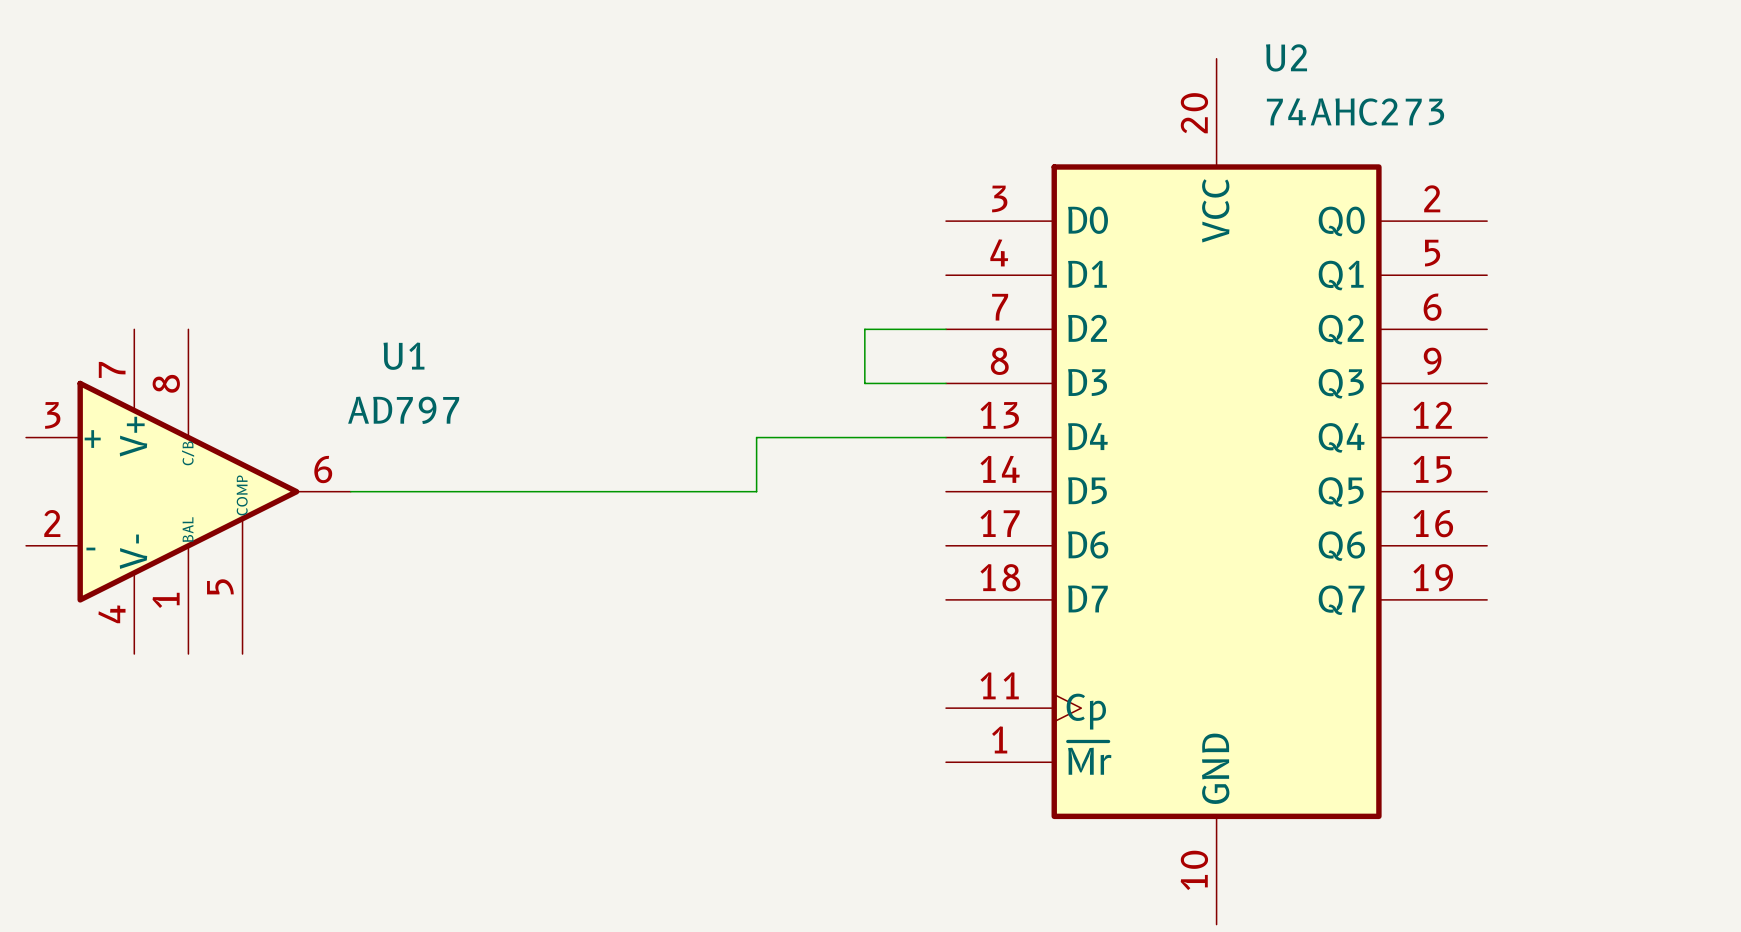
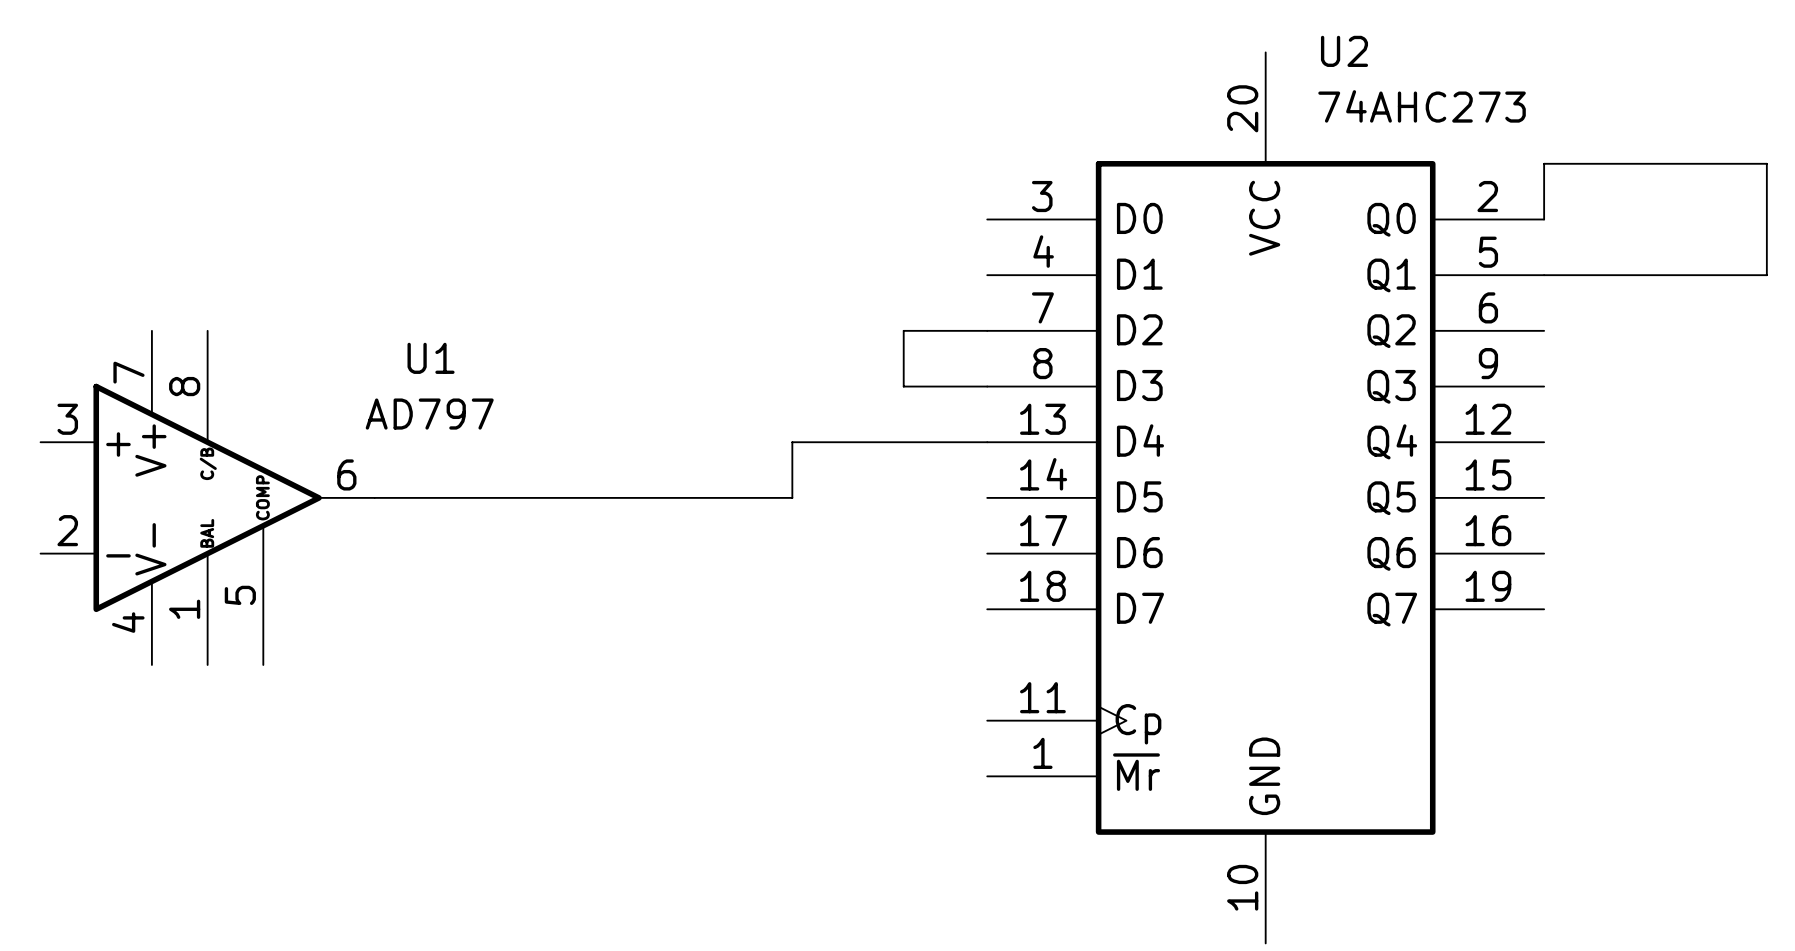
wire: none -> (1544, 219) (1544, 163) (1766, 163) (1766, 275) (1544, 275)

